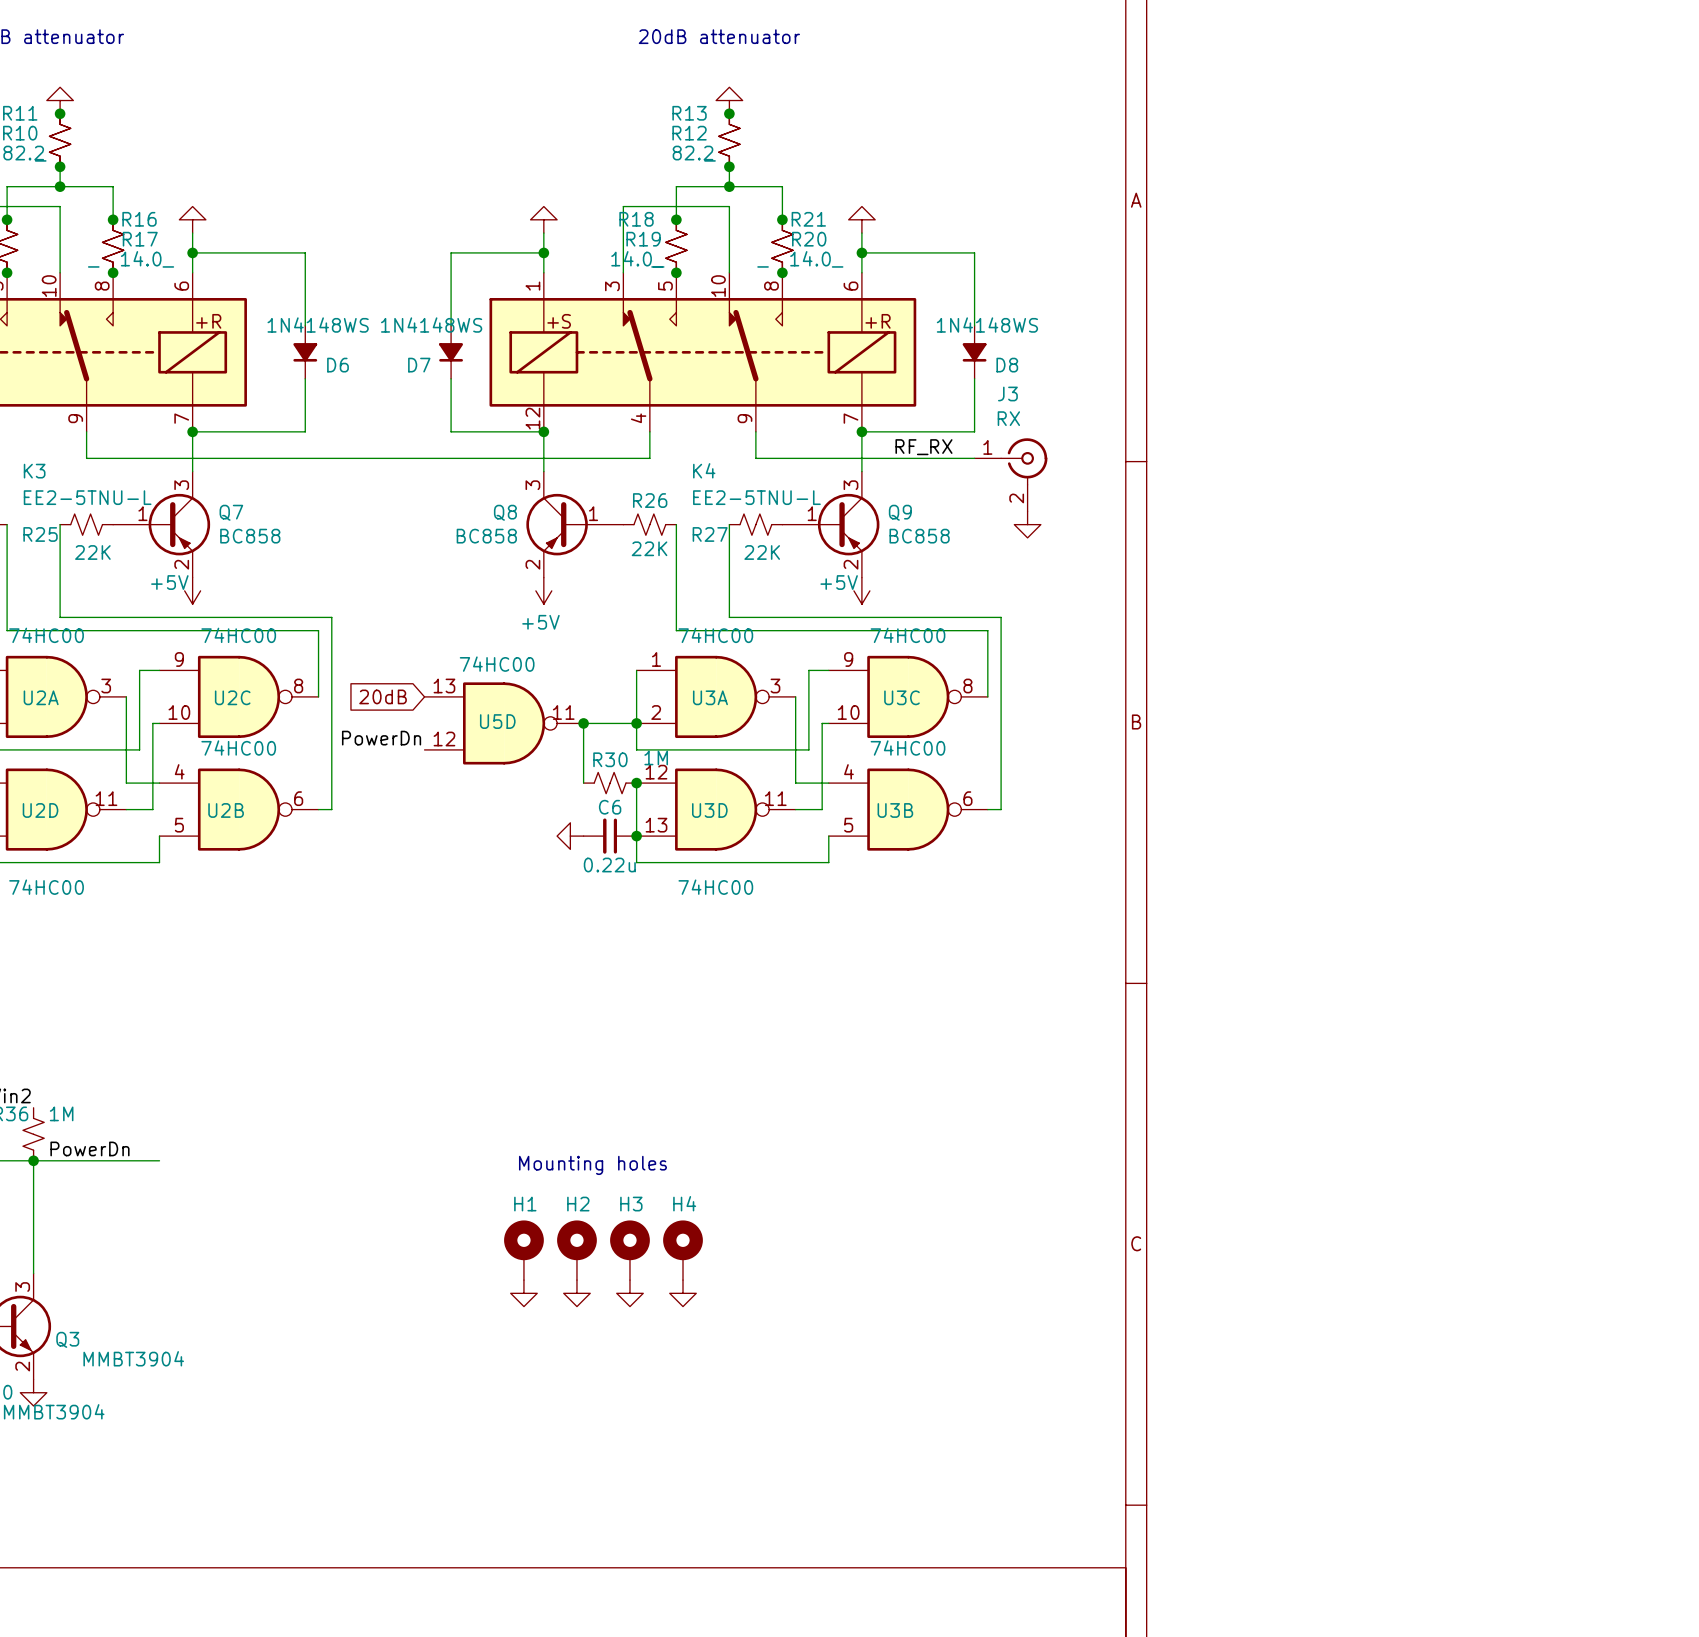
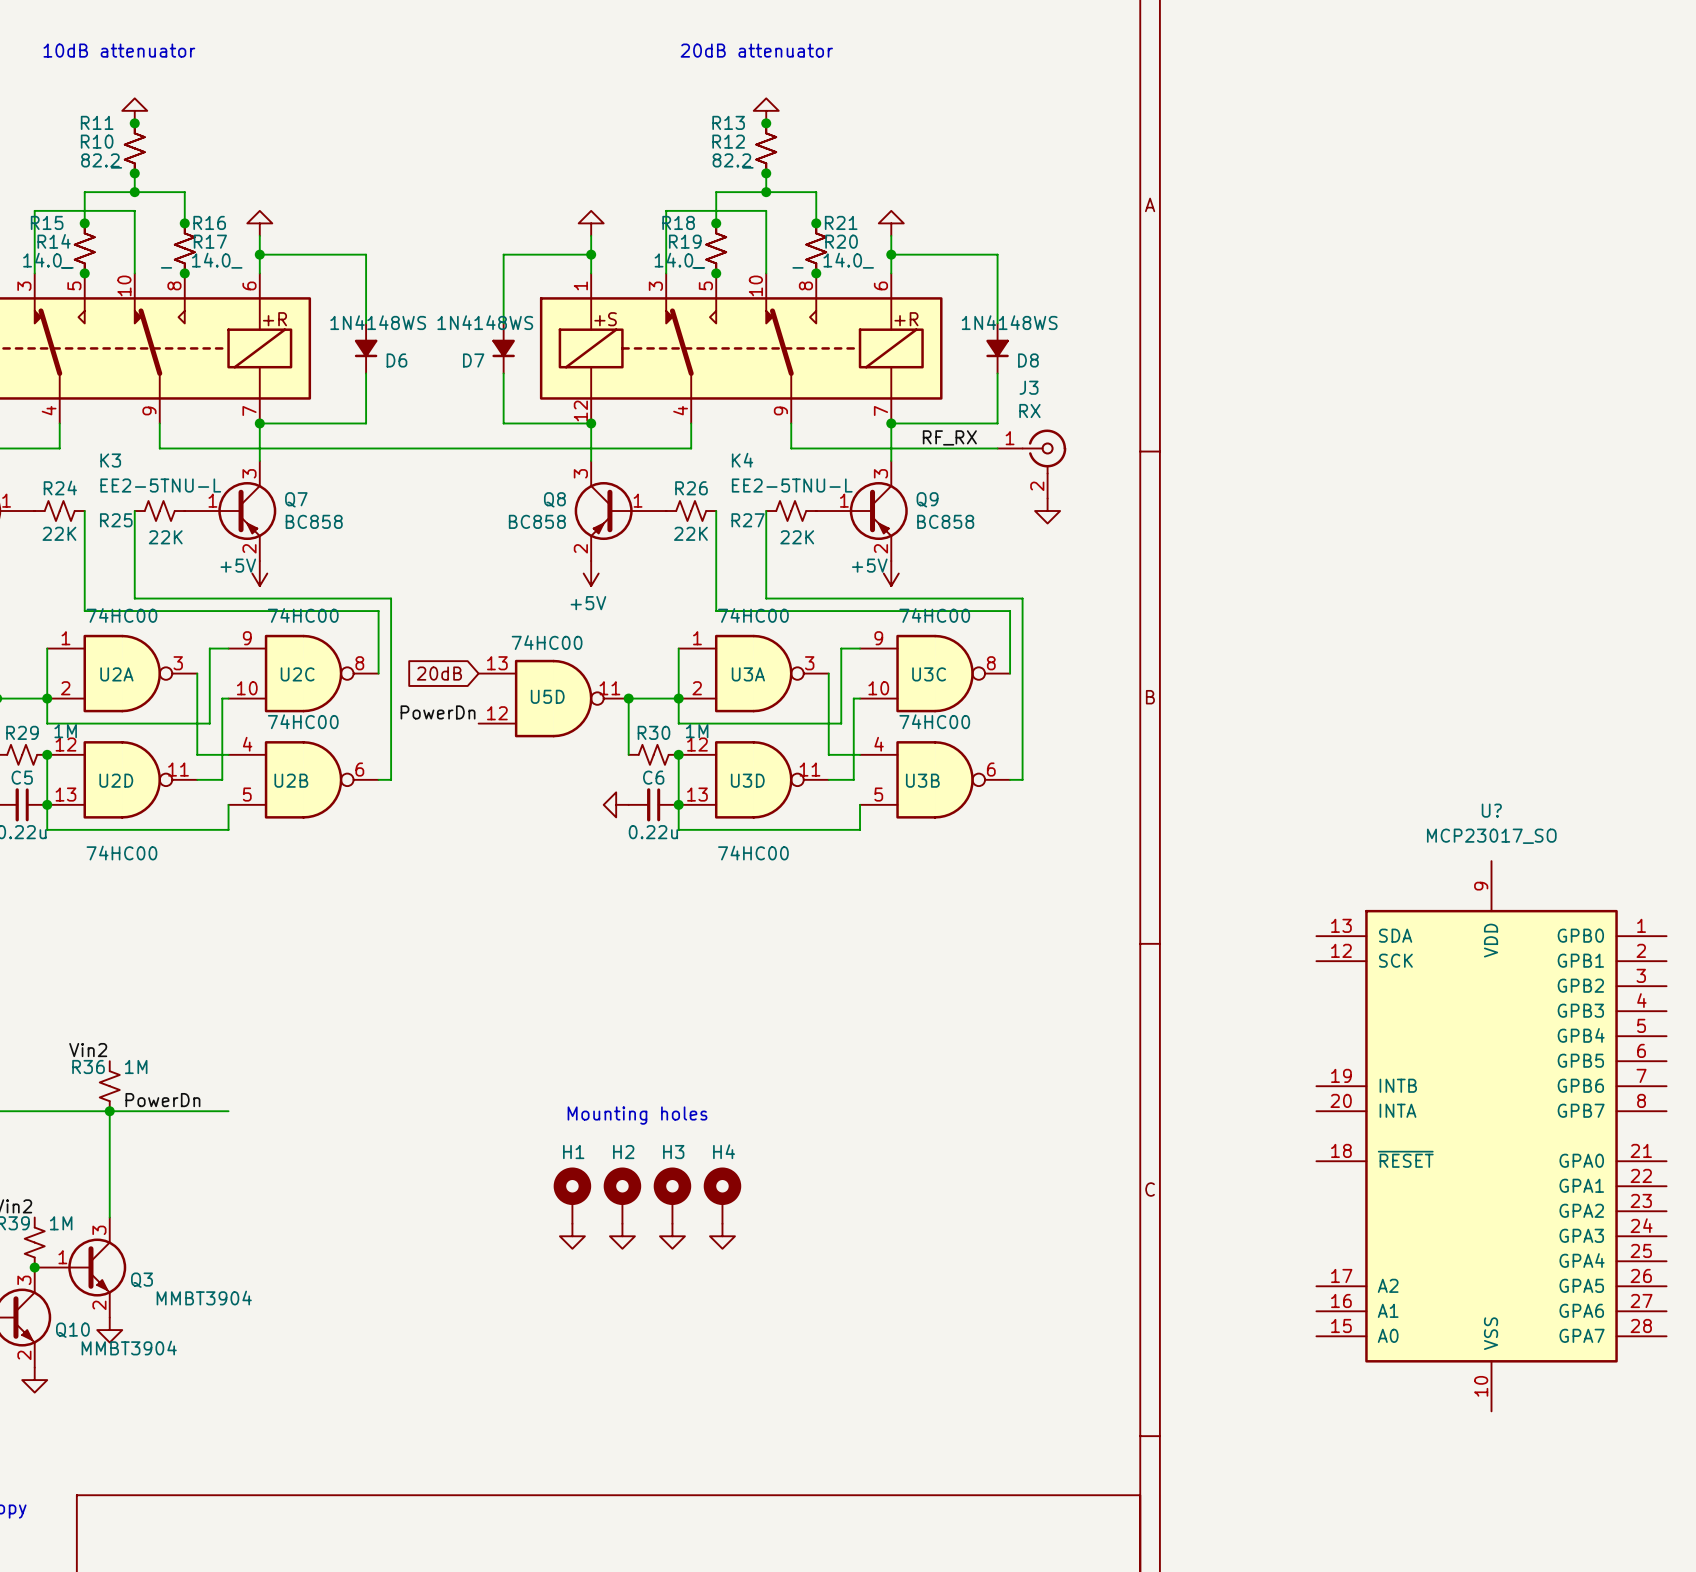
U?: none -> MCP23017_SO (1491, 1136)

